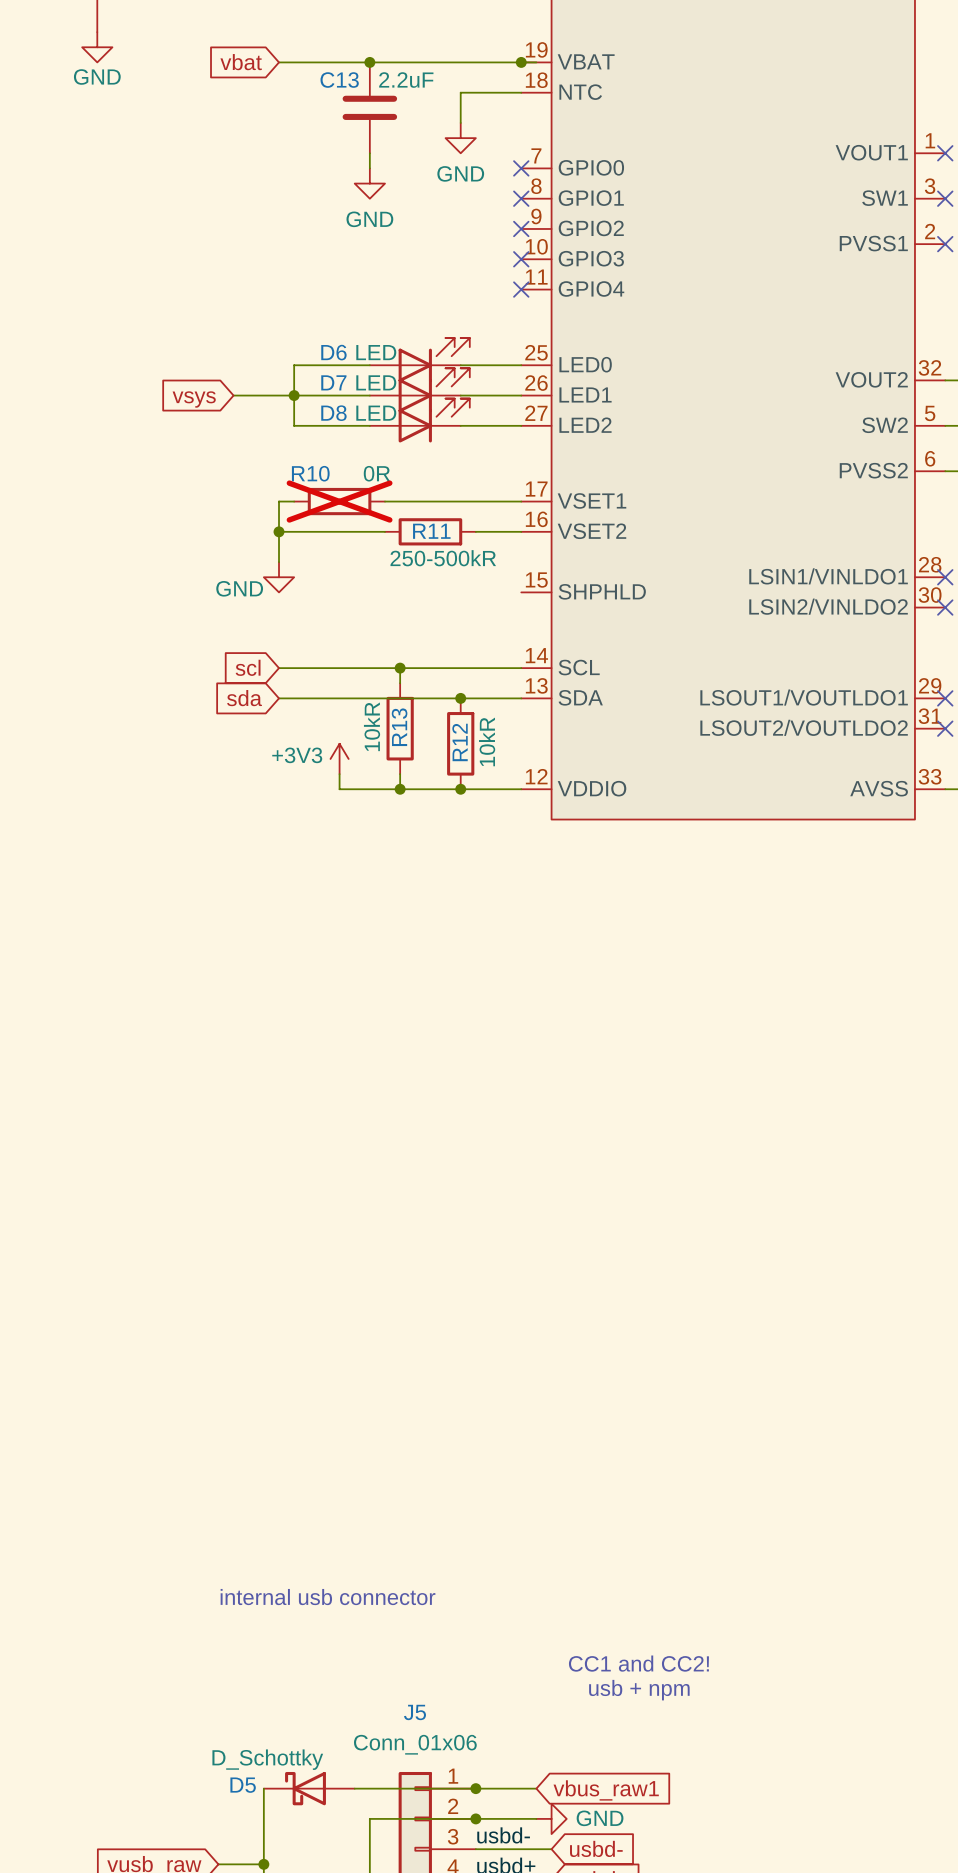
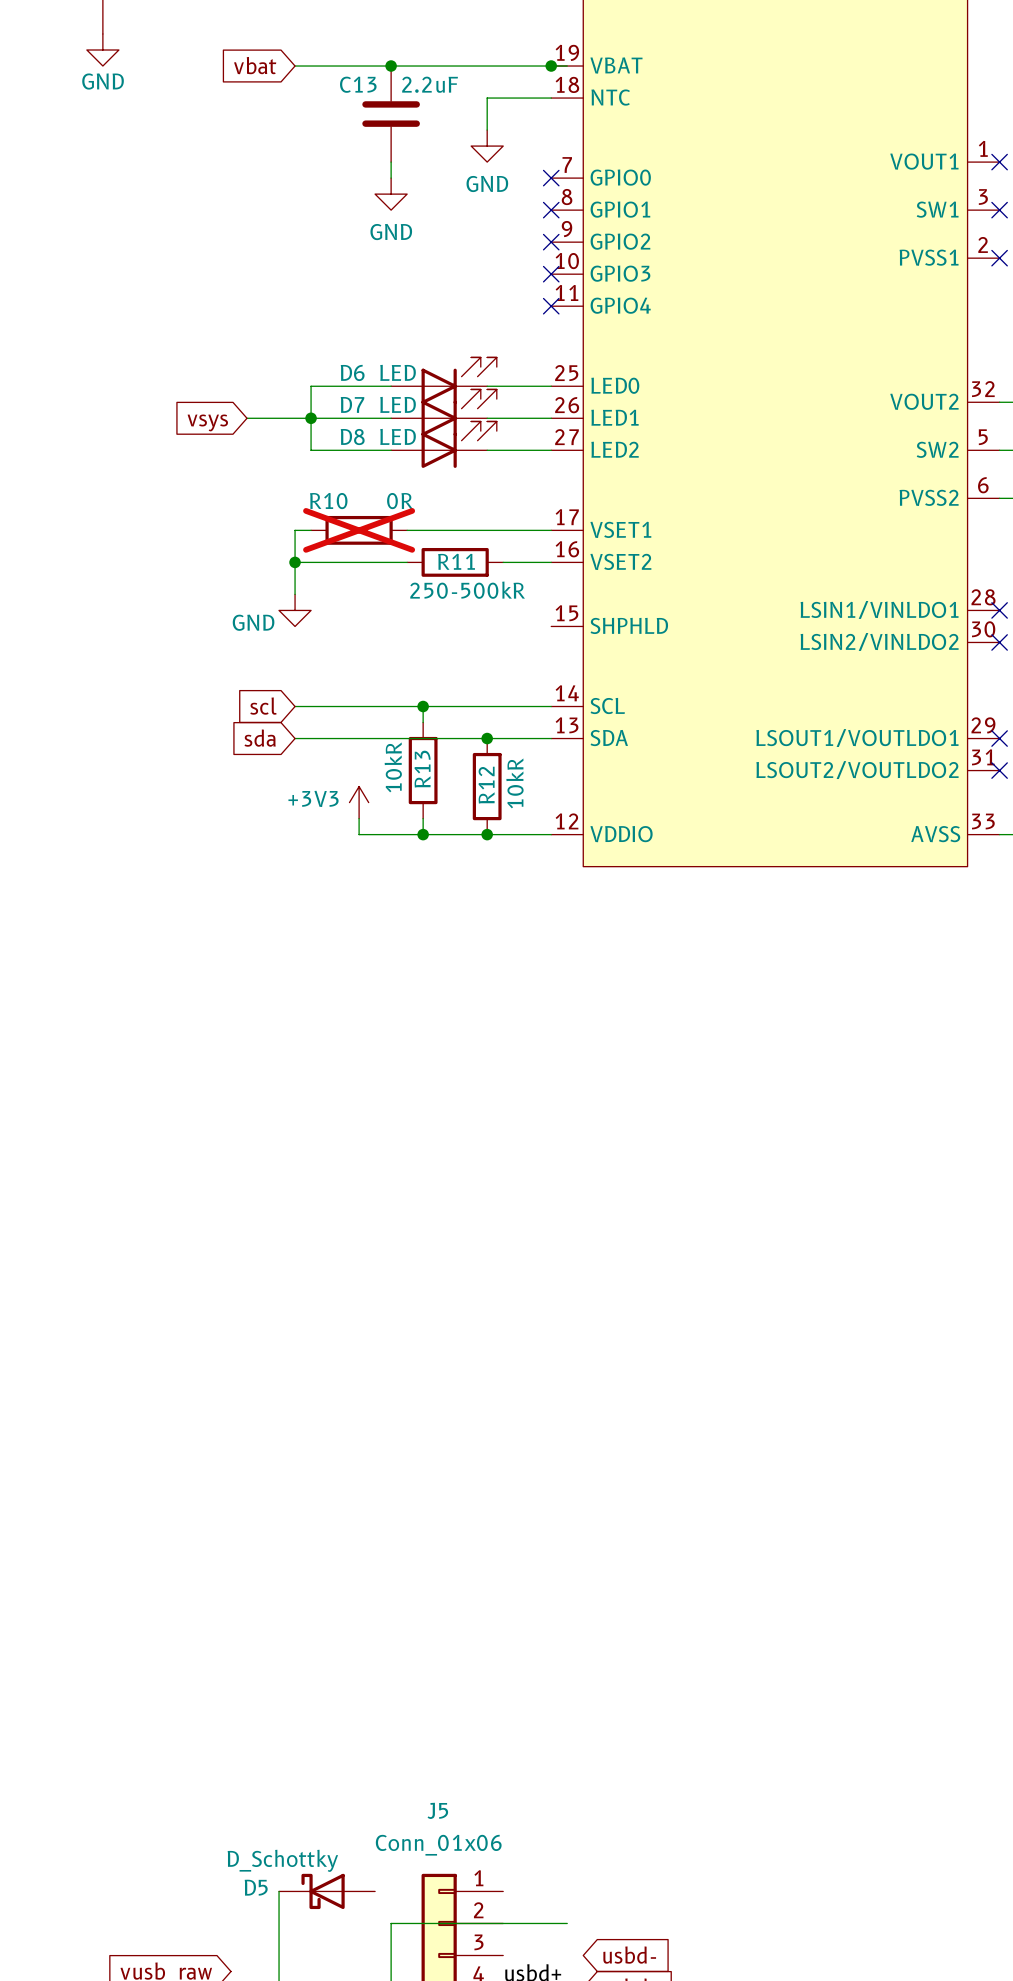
text: internal usb connector (328, 1597) -> none
text: CC1 and CC2! (638, 1663) -> none
text: usb + npm (639, 1690) -> none
wire: (354, 1788) (536, 1788) -> none
junction: (475, 1788) -> none
global label: vbus_raw1 (606, 1790) -> none
junction: (475, 1818) -> none
power symbol: GND (551, 1818) -> none
label: usbd- (503, 1835) -> none
wire: (475, 1849) (551, 1849) -> none
wire: (218, 1864) (263, 1864) -> none
junction: (263, 1864) -> none

